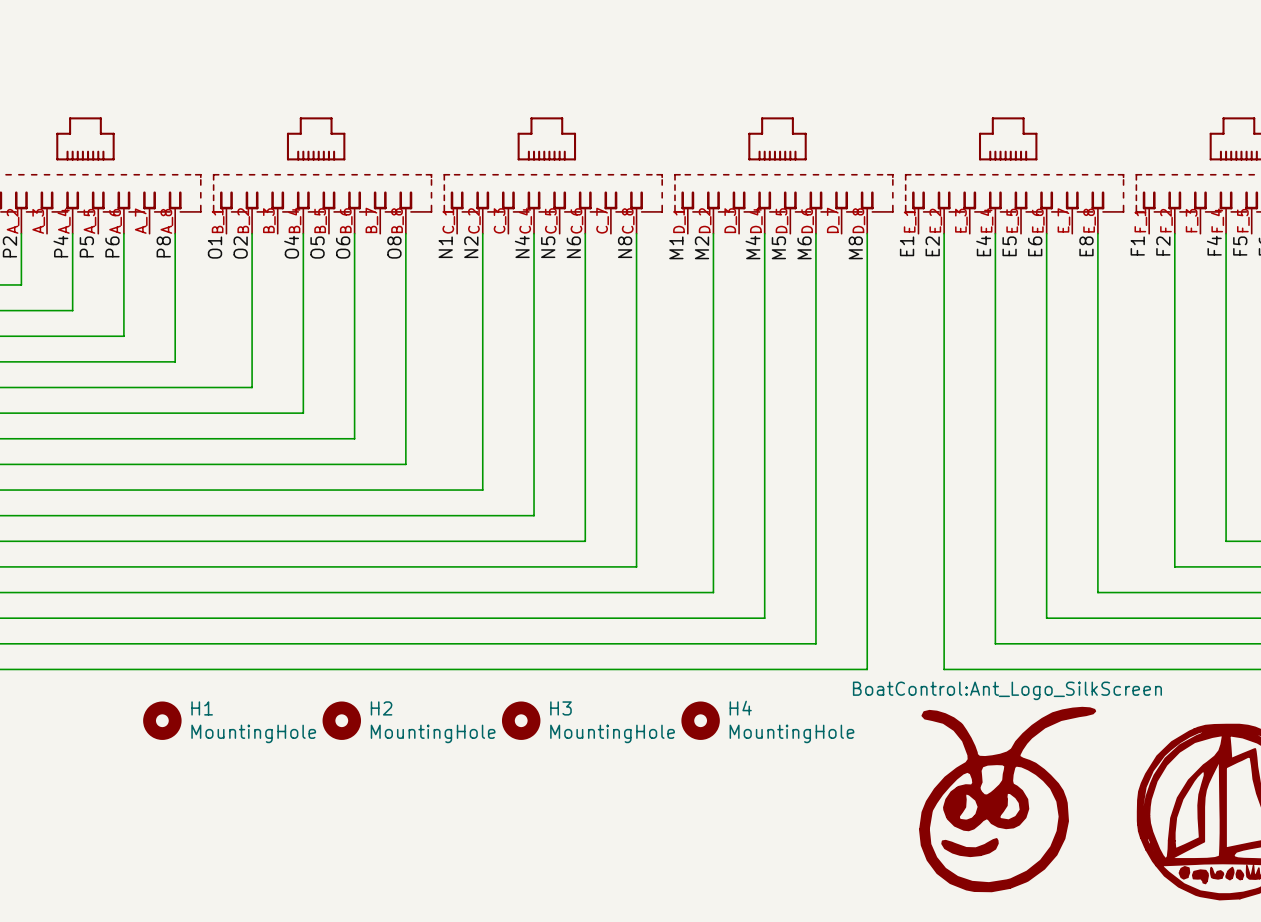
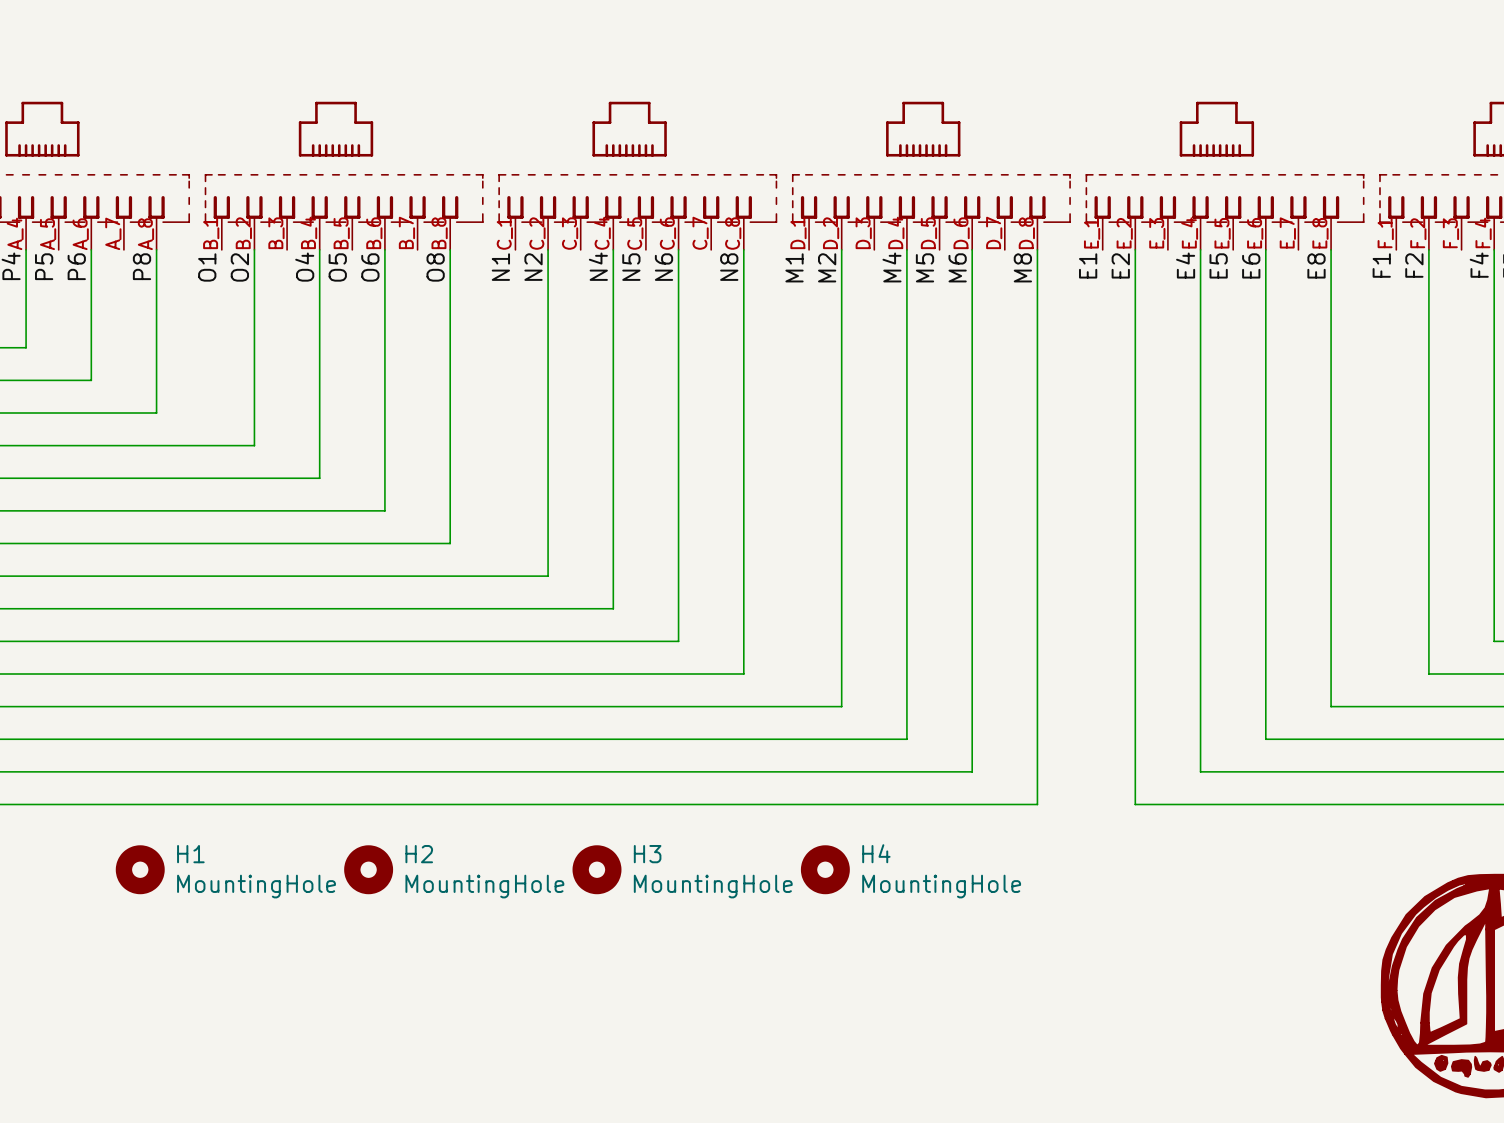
part: (1007, 799) -> none

